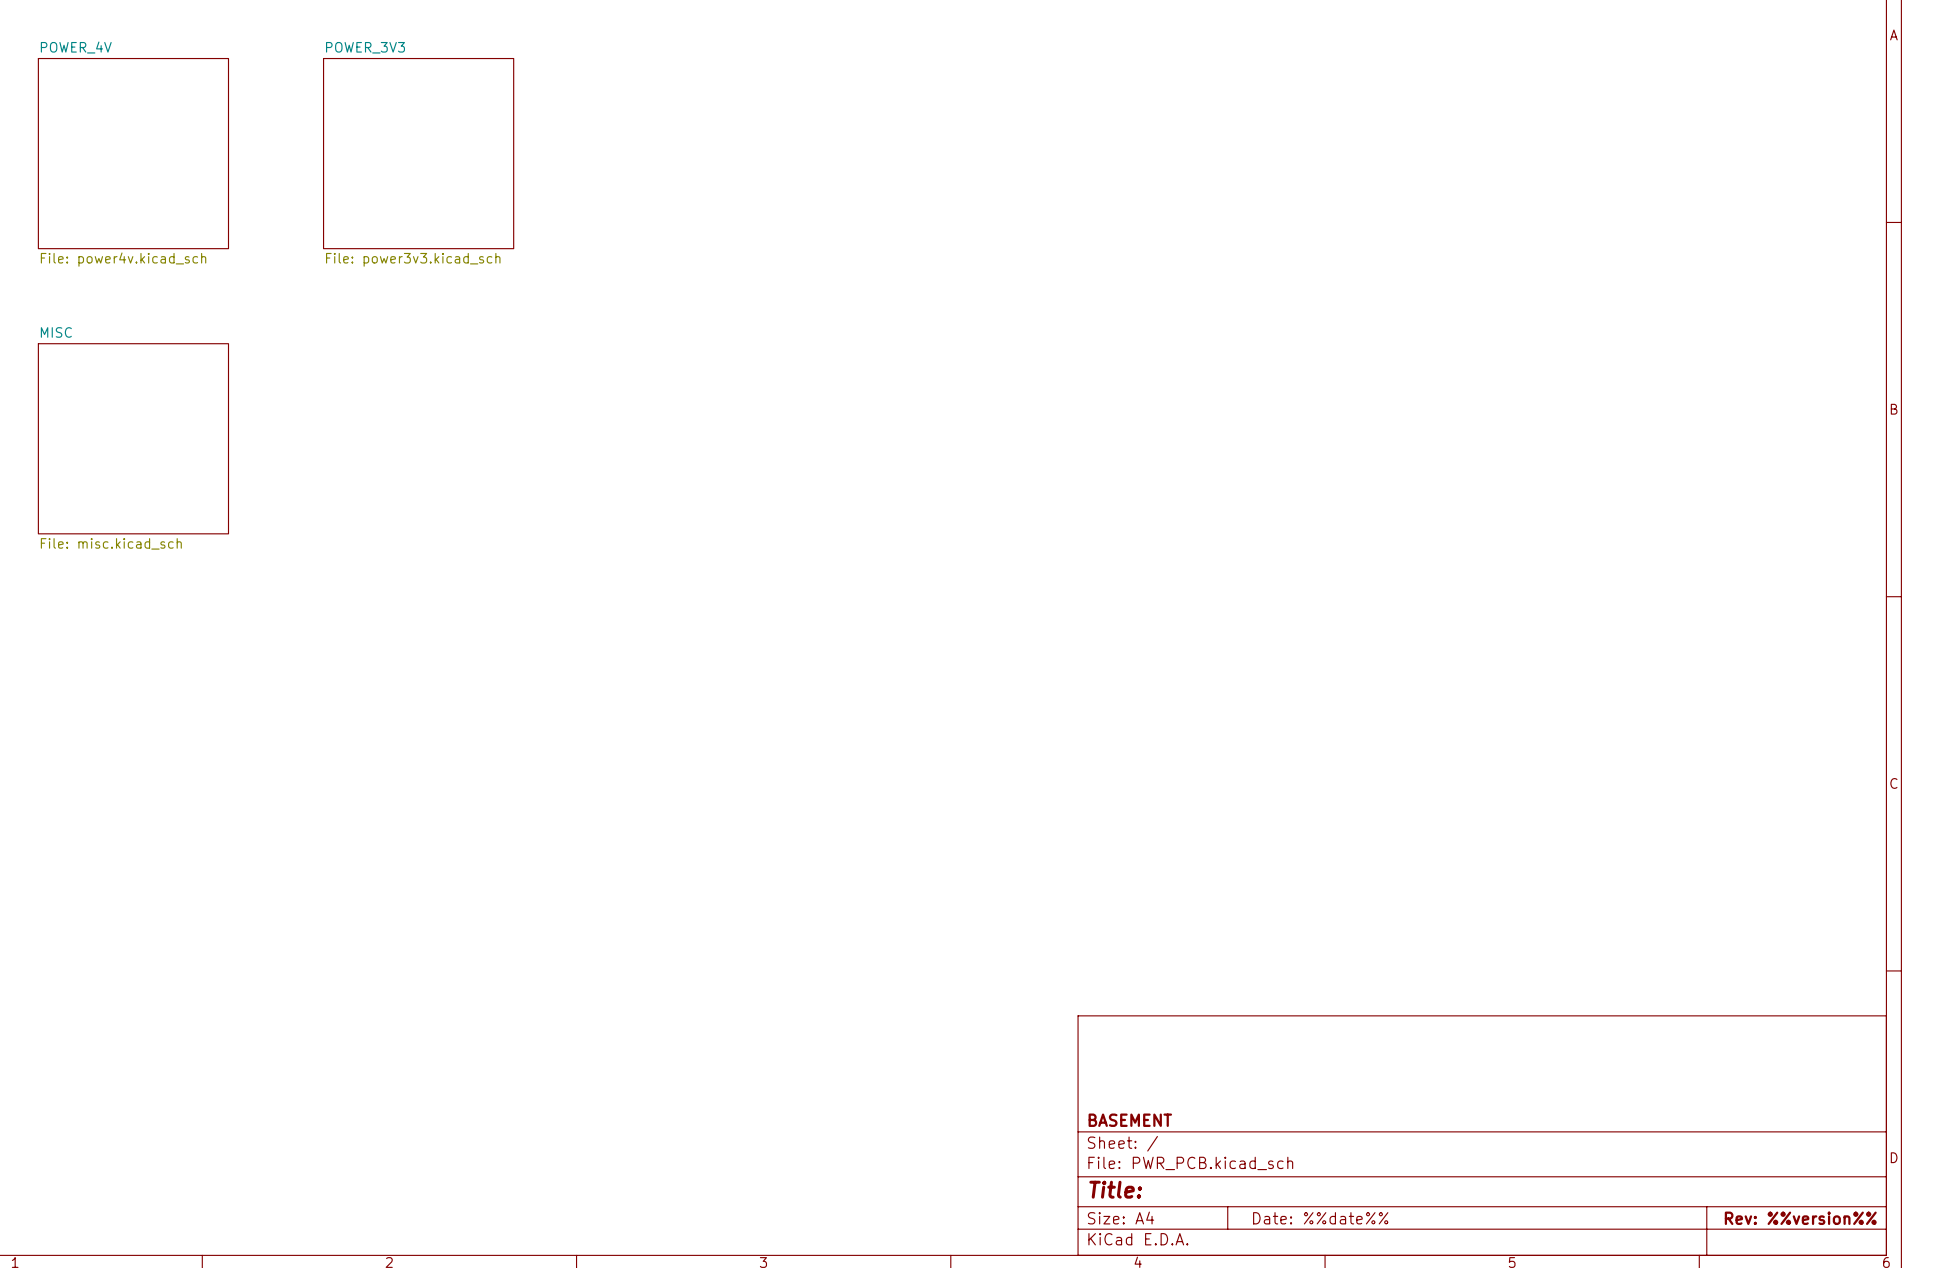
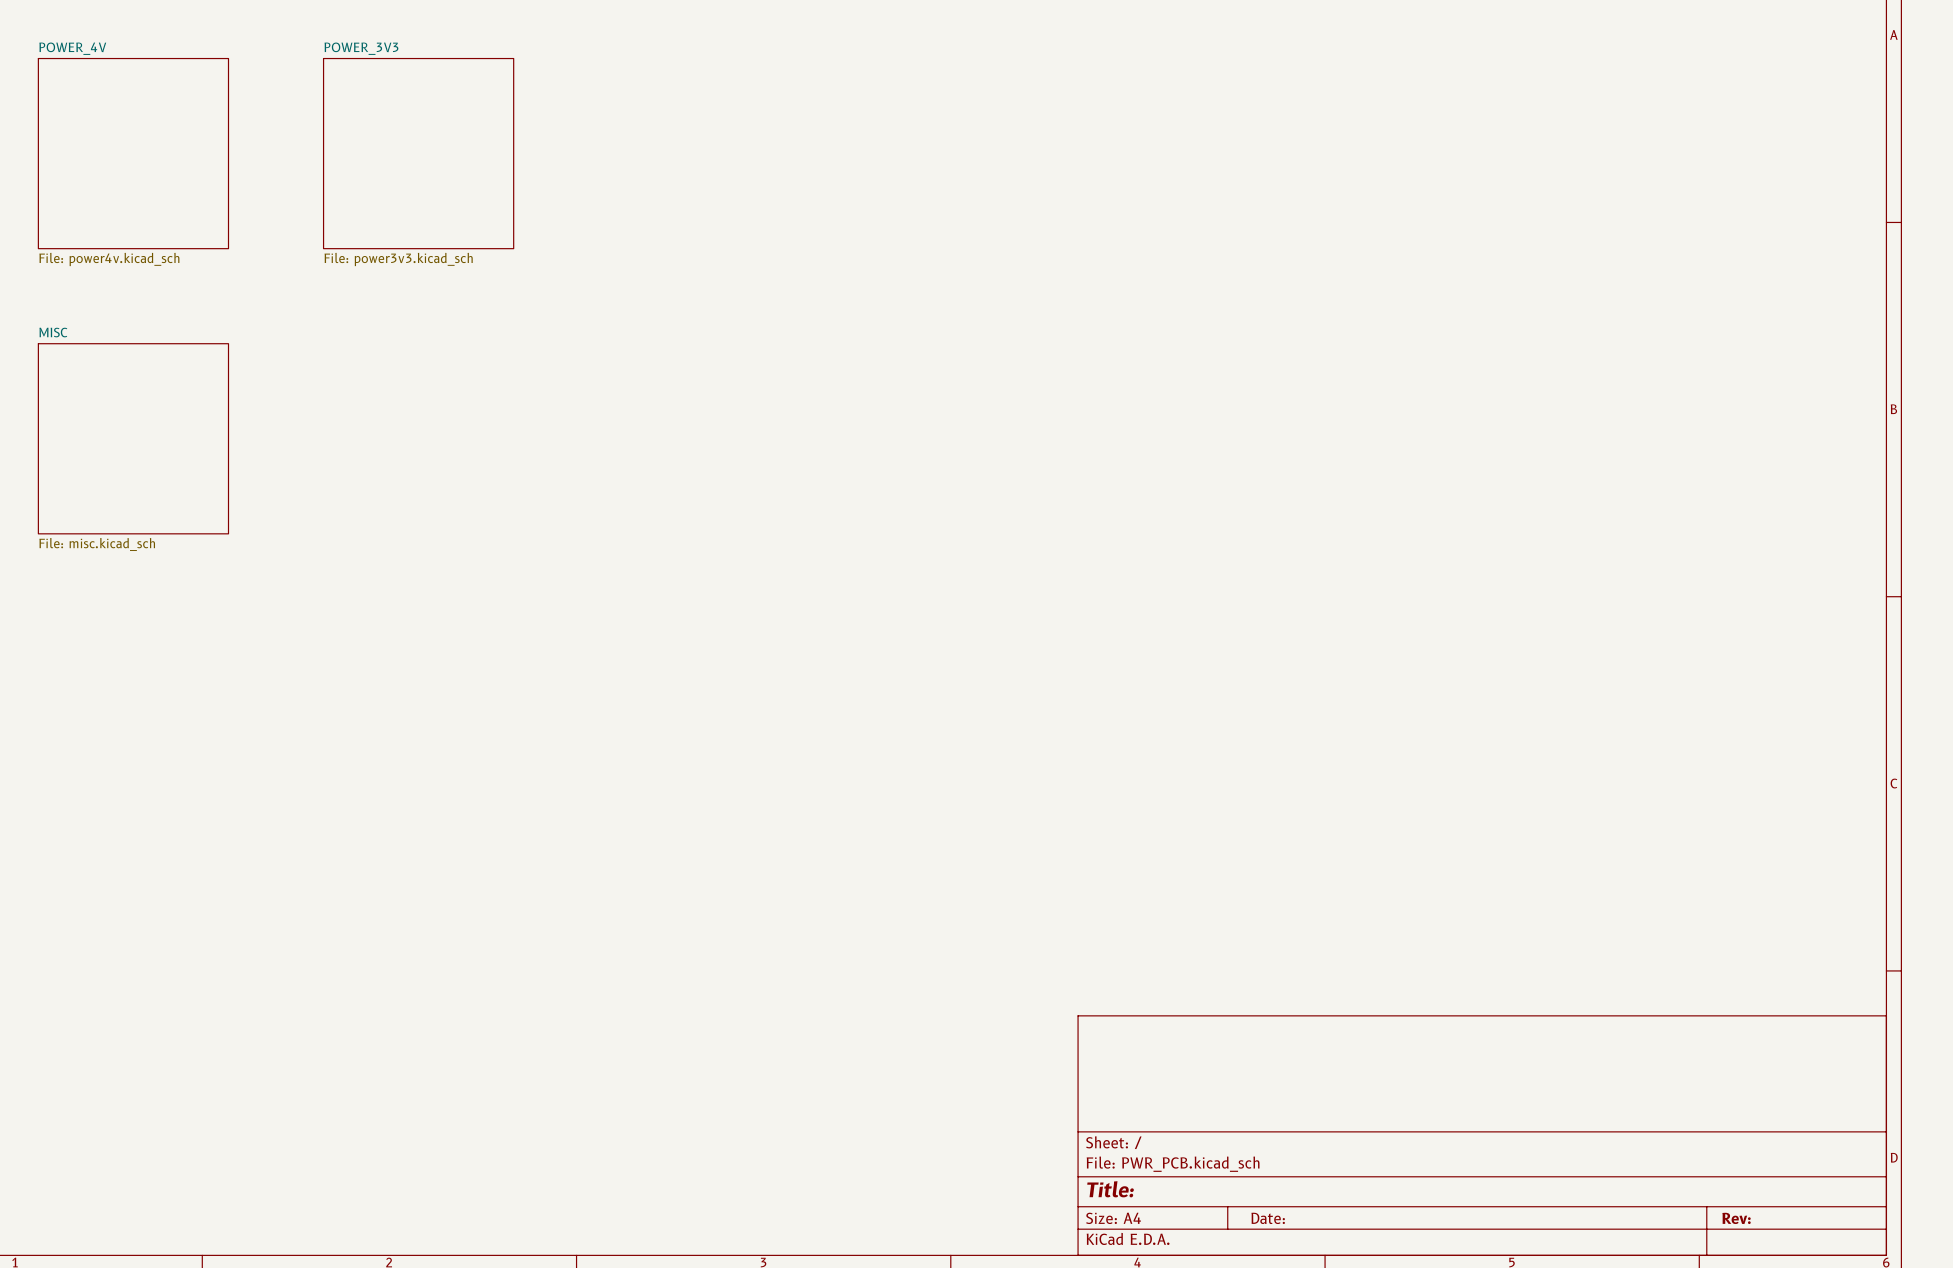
title block: BASEMENT (1130, 1120) -> none
title block: Date: %%date%% (1320, 1218) -> Date: (1268, 1218)
title block: Rev: %%version%% (1800, 1218) -> Rev: (1736, 1218)

